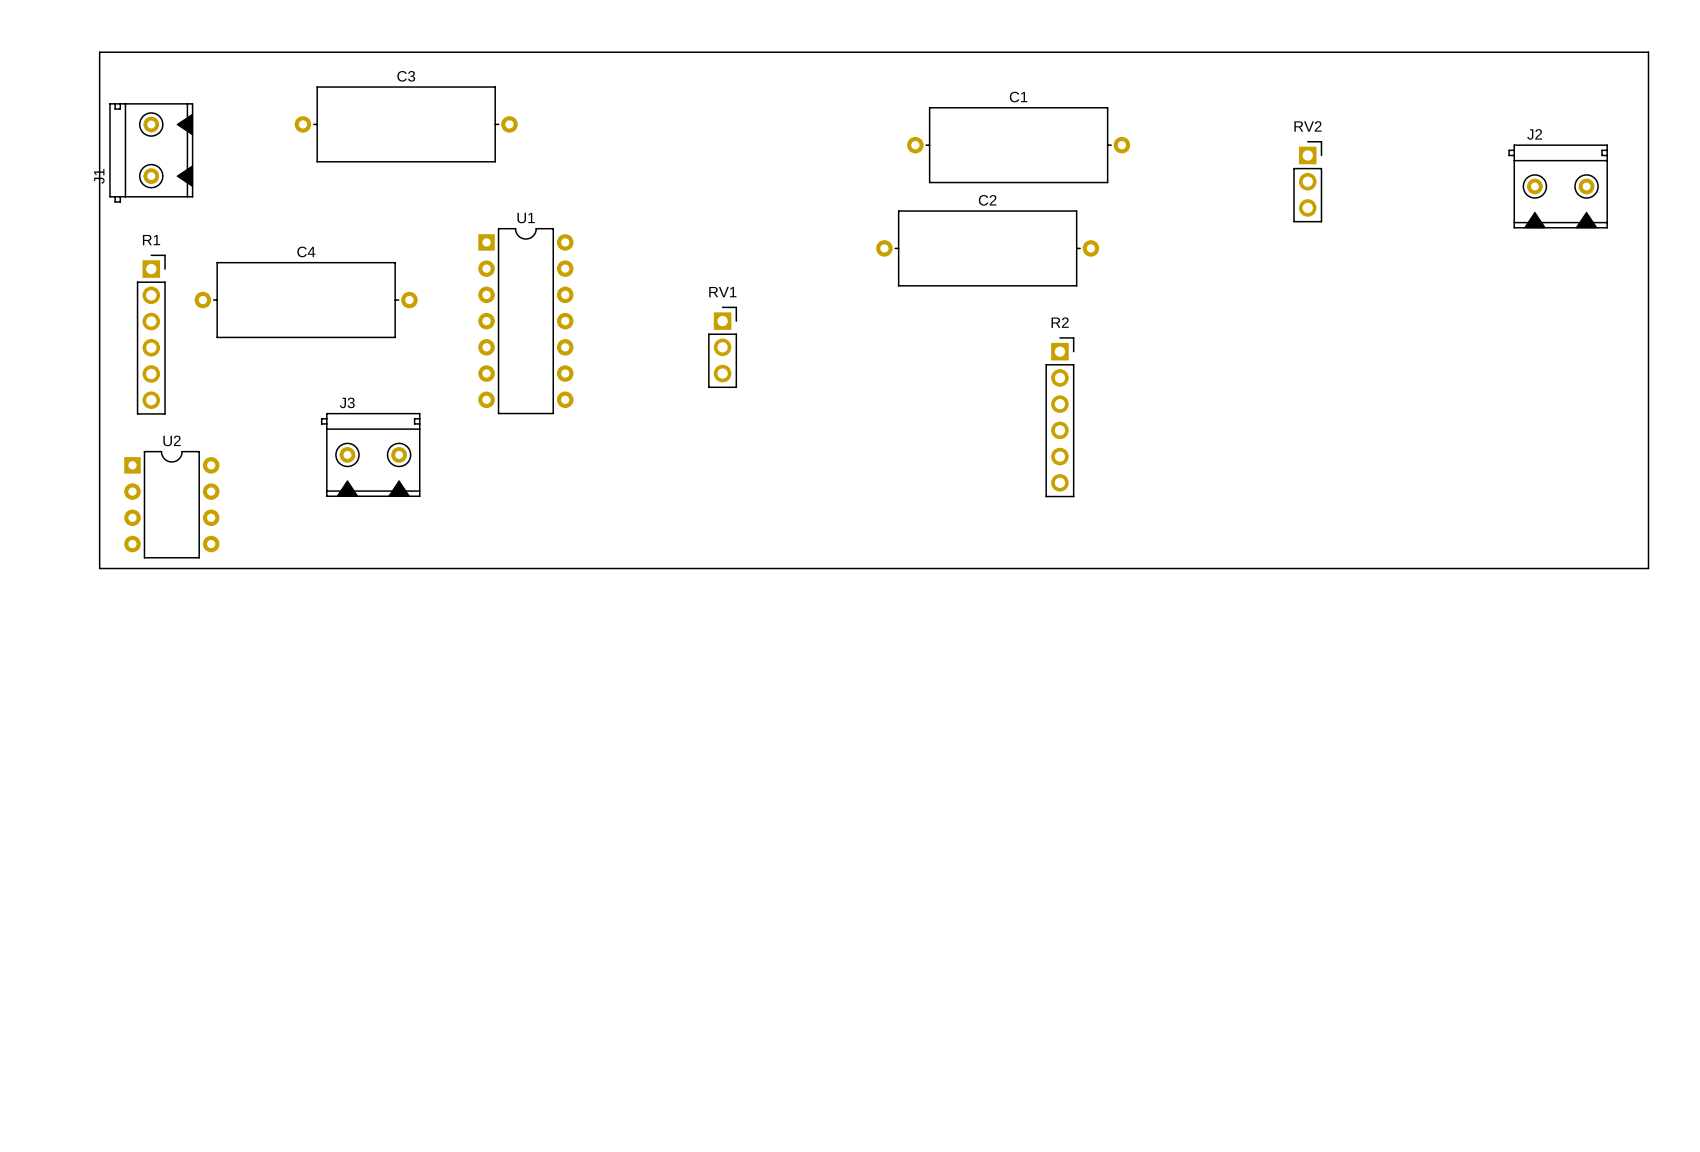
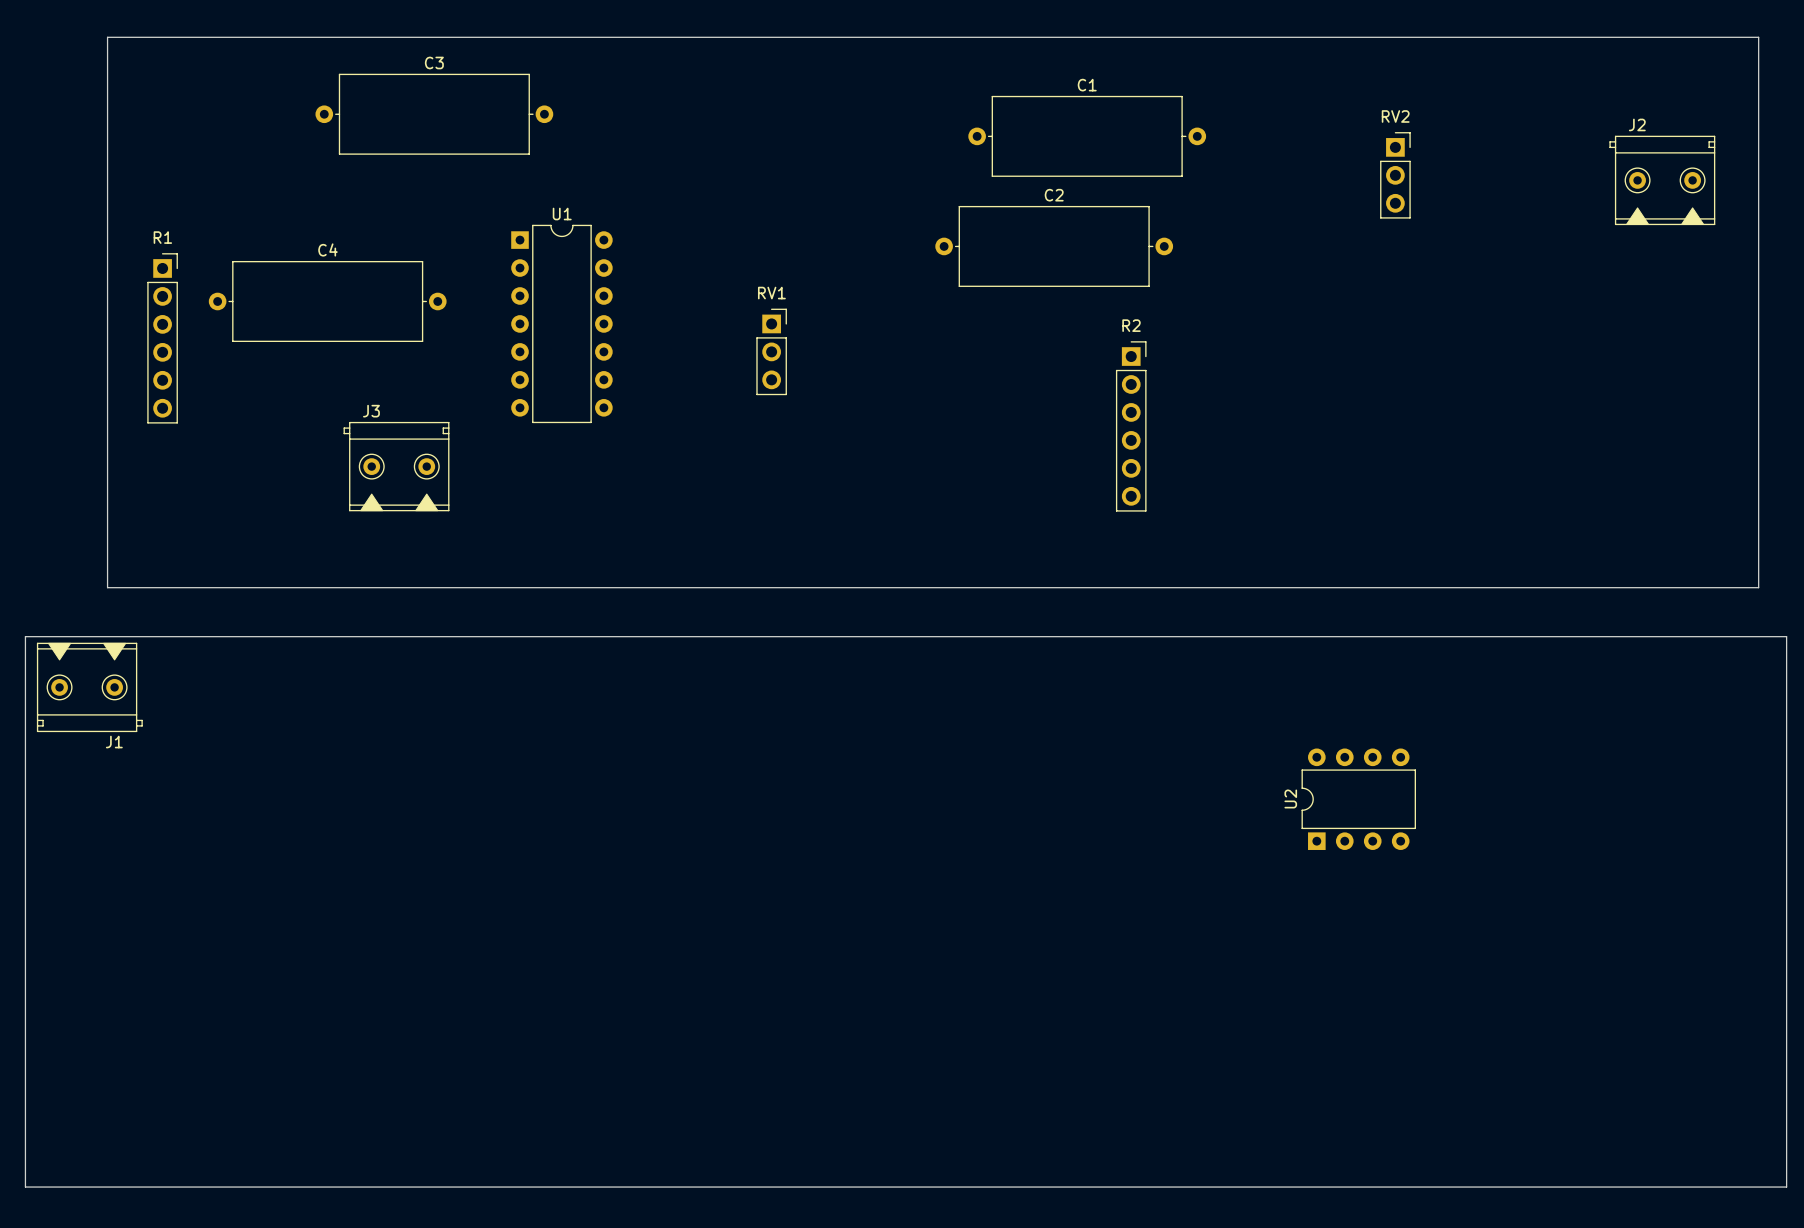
J1 rotation: 0° (151, 152) -> 90° counterclockwise (89, 687)
J1 position: (151, 152) -> (89, 687)
U2 rotation: 0° (171, 504) -> 90° counterclockwise (1358, 799)
U2 position: (171, 504) -> (1358, 799)
board edge: none -> (25, 636) (25, 1187) (1786, 1187) (1786, 636) (25, 636)

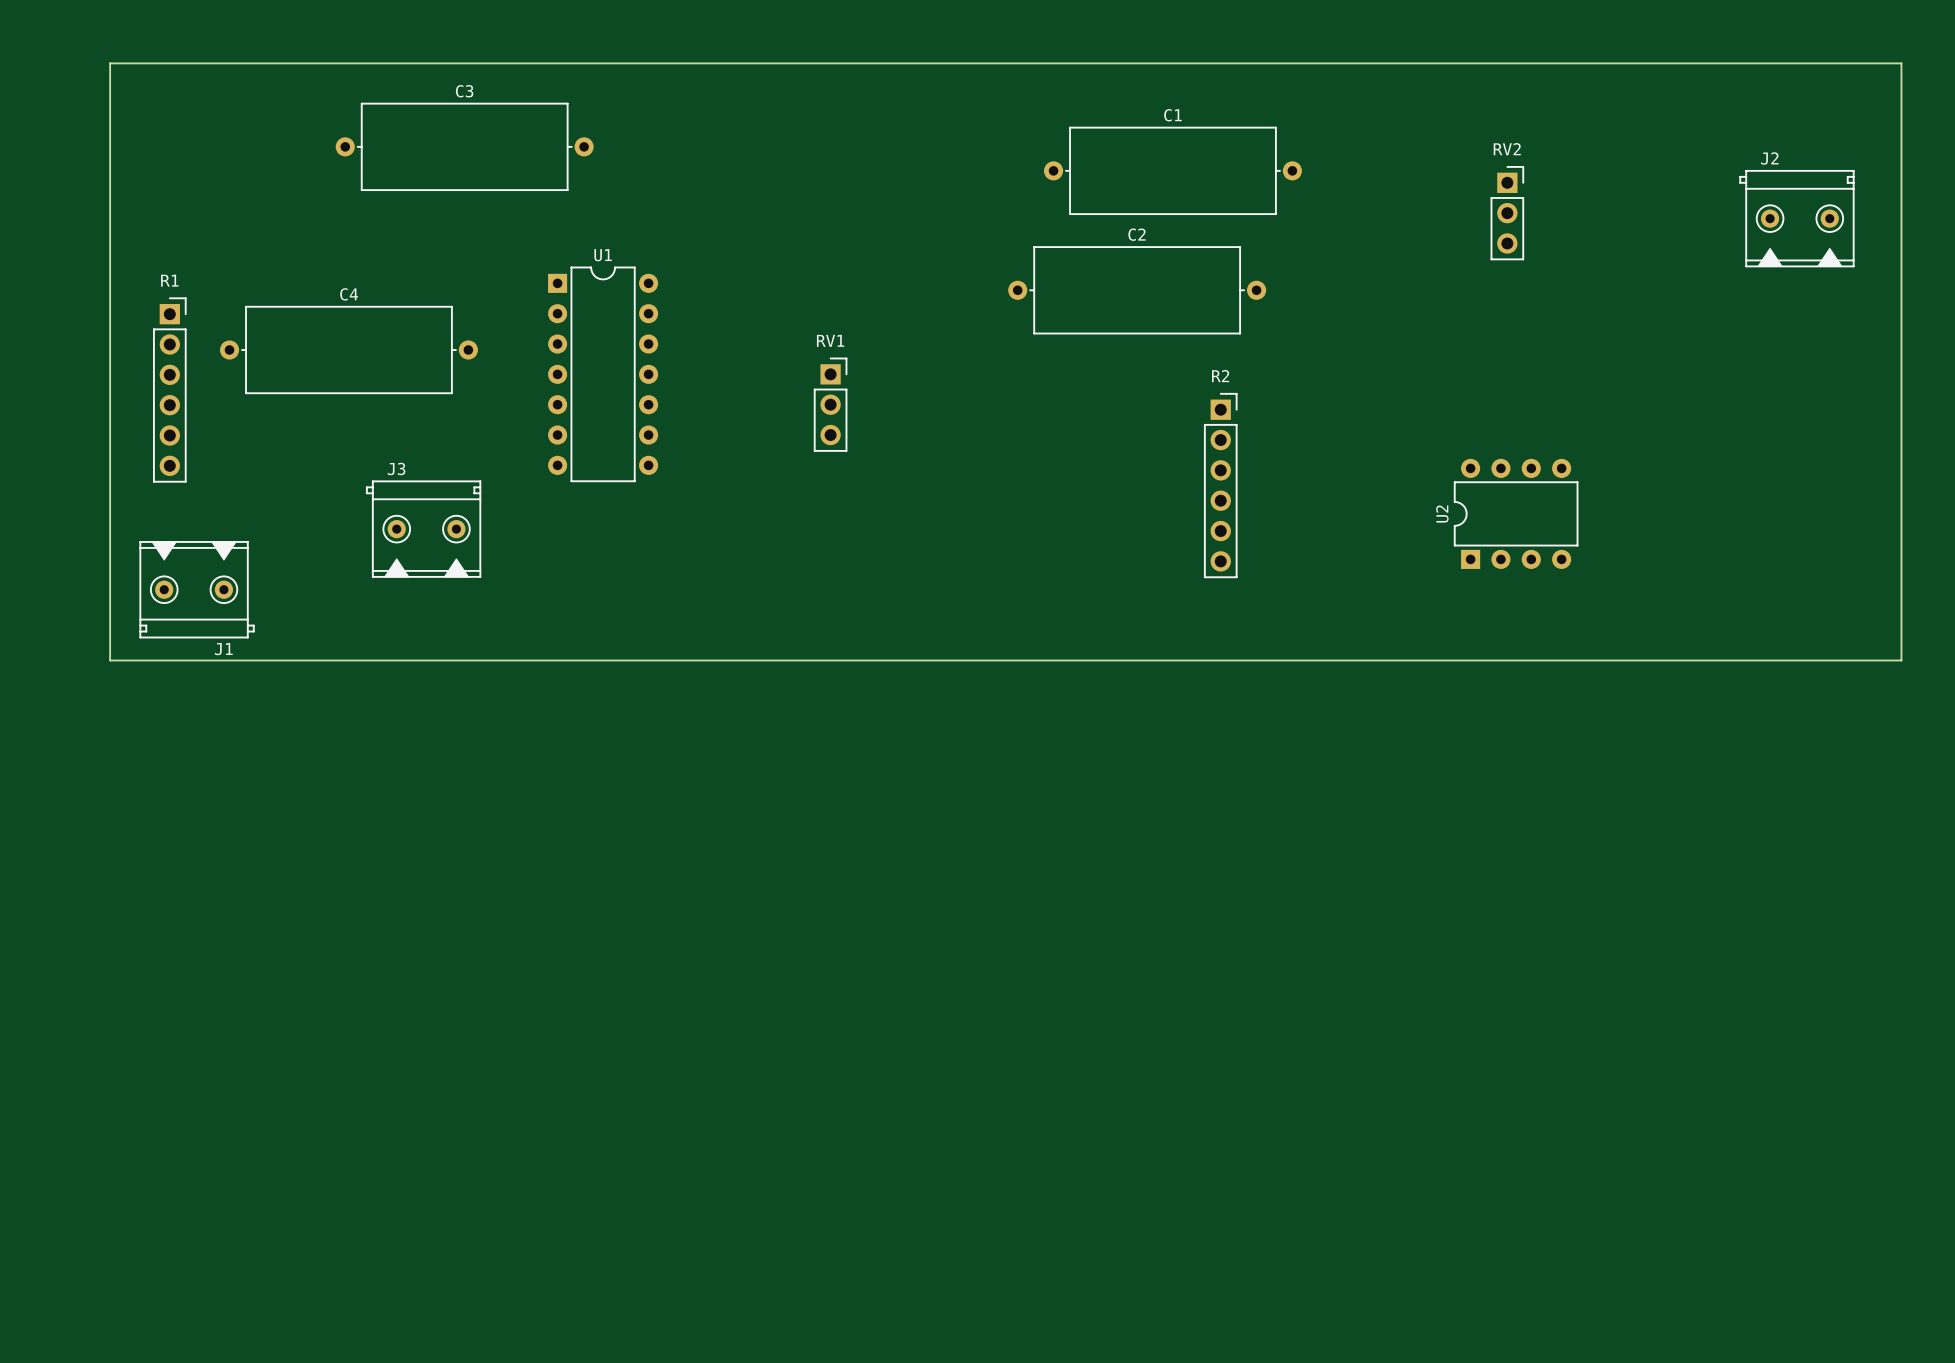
board edge: (25, 636) (25, 1187) (1786, 1187) (1786, 636) (25, 636) -> none
J1 position: (89, 687) -> (197, 589)
U2 position: (1358, 799) -> (1516, 513)

